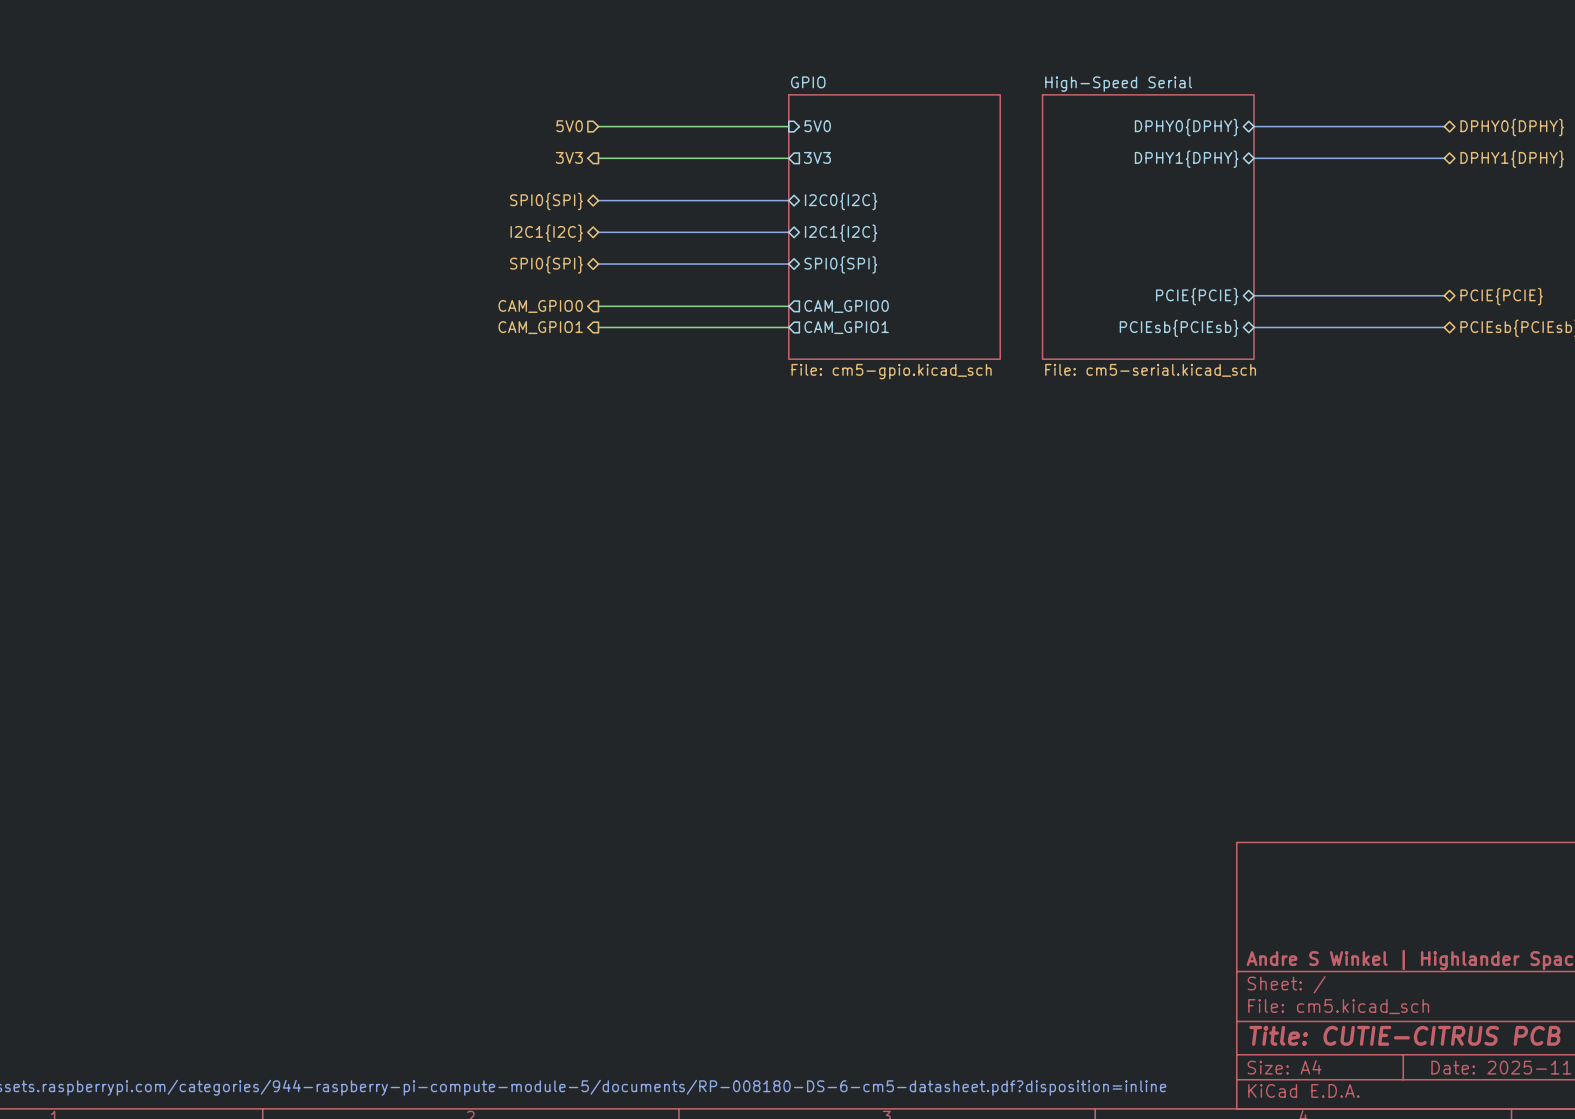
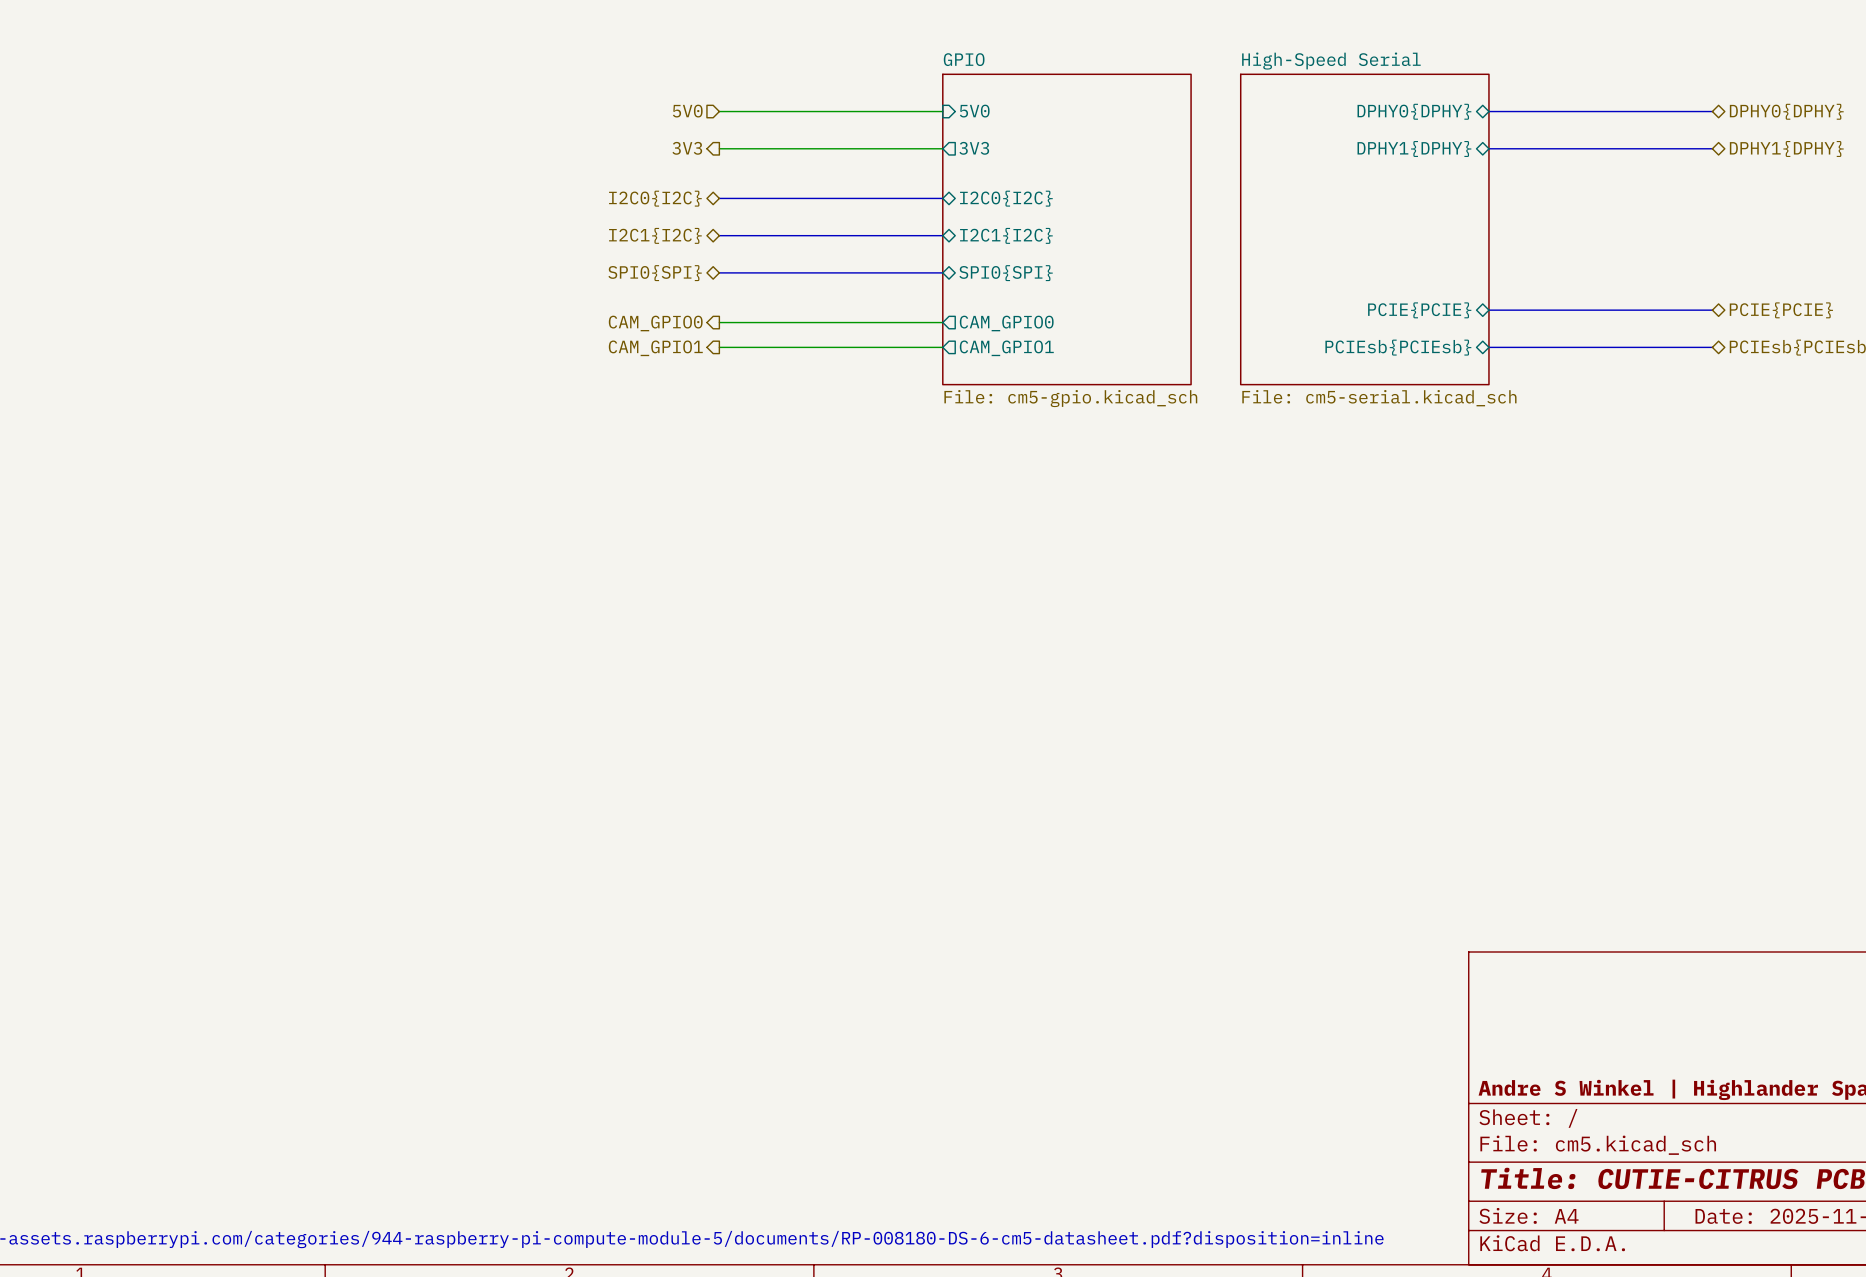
hierarchical label: SPI0{SPI} (546, 201) -> I2C0{I2C} (655, 198)

